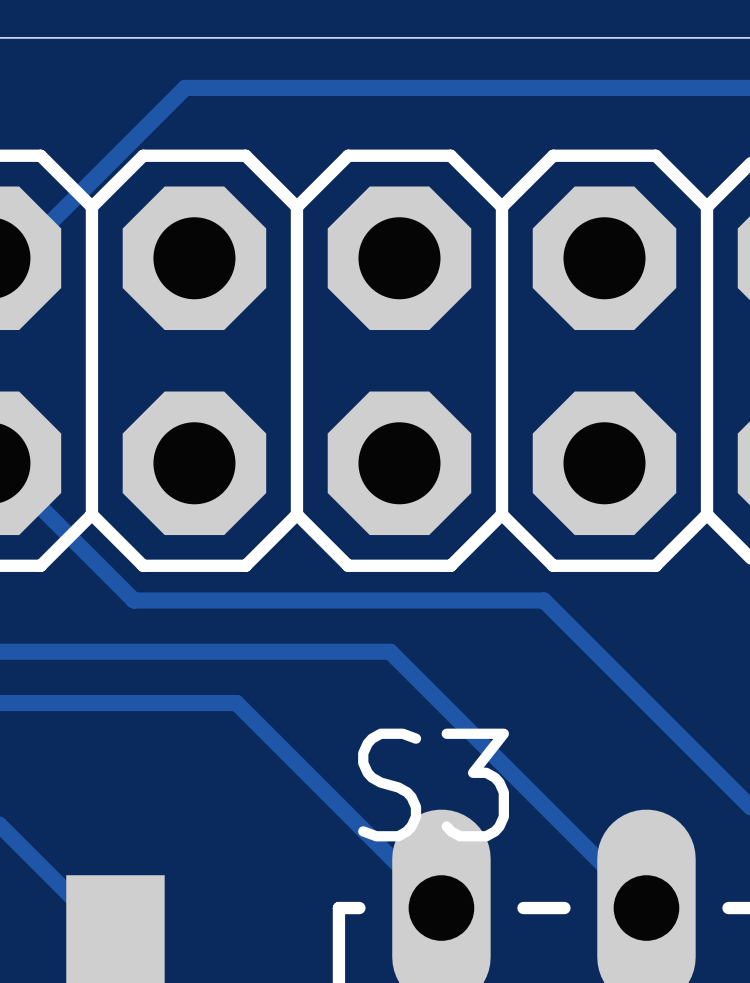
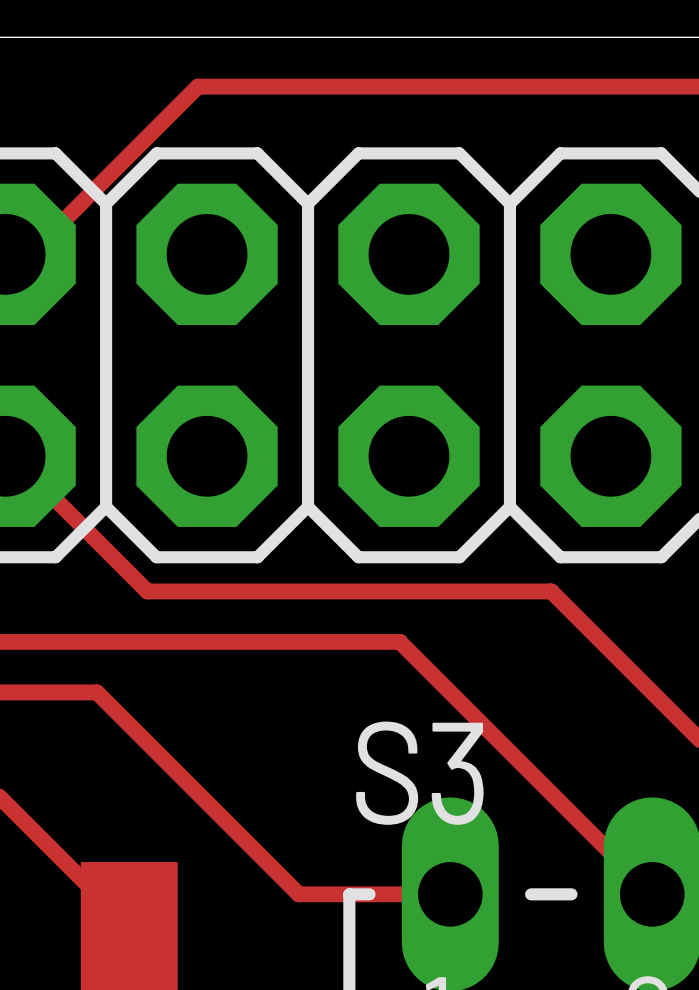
track: (82, 703) (236, 703) (441, 908) -> (96, 692) (298, 894) (450, 894)

